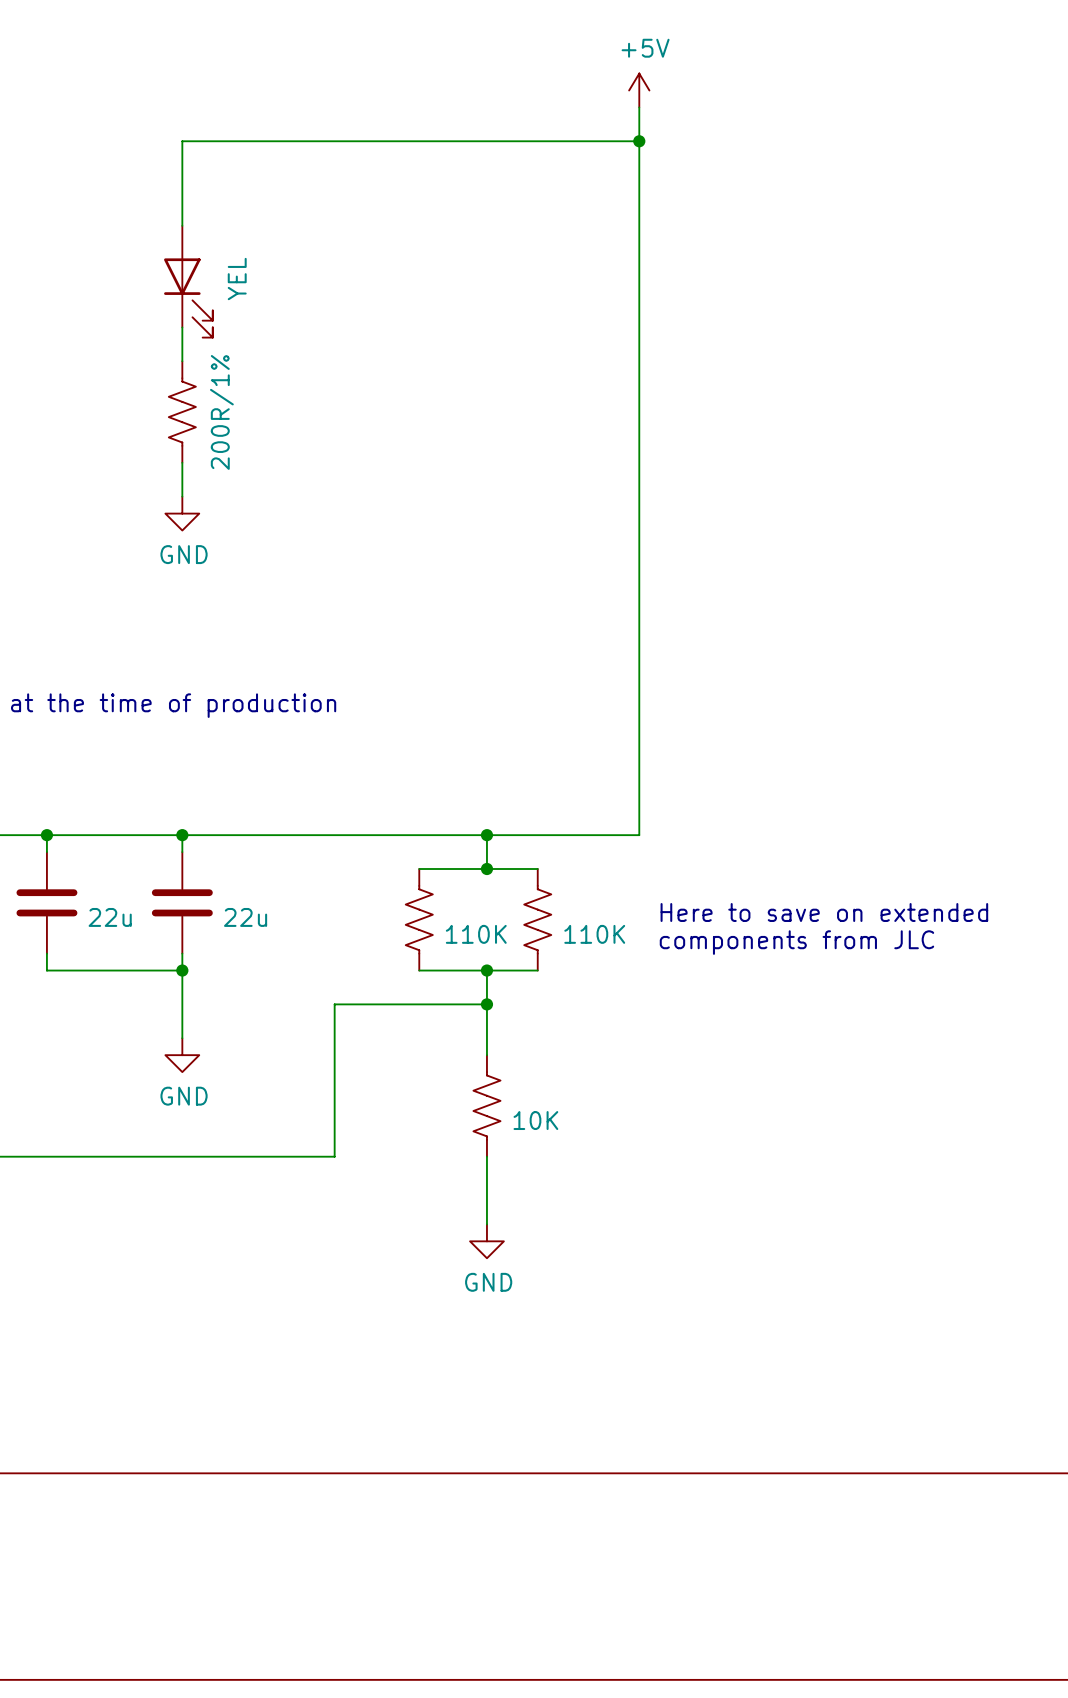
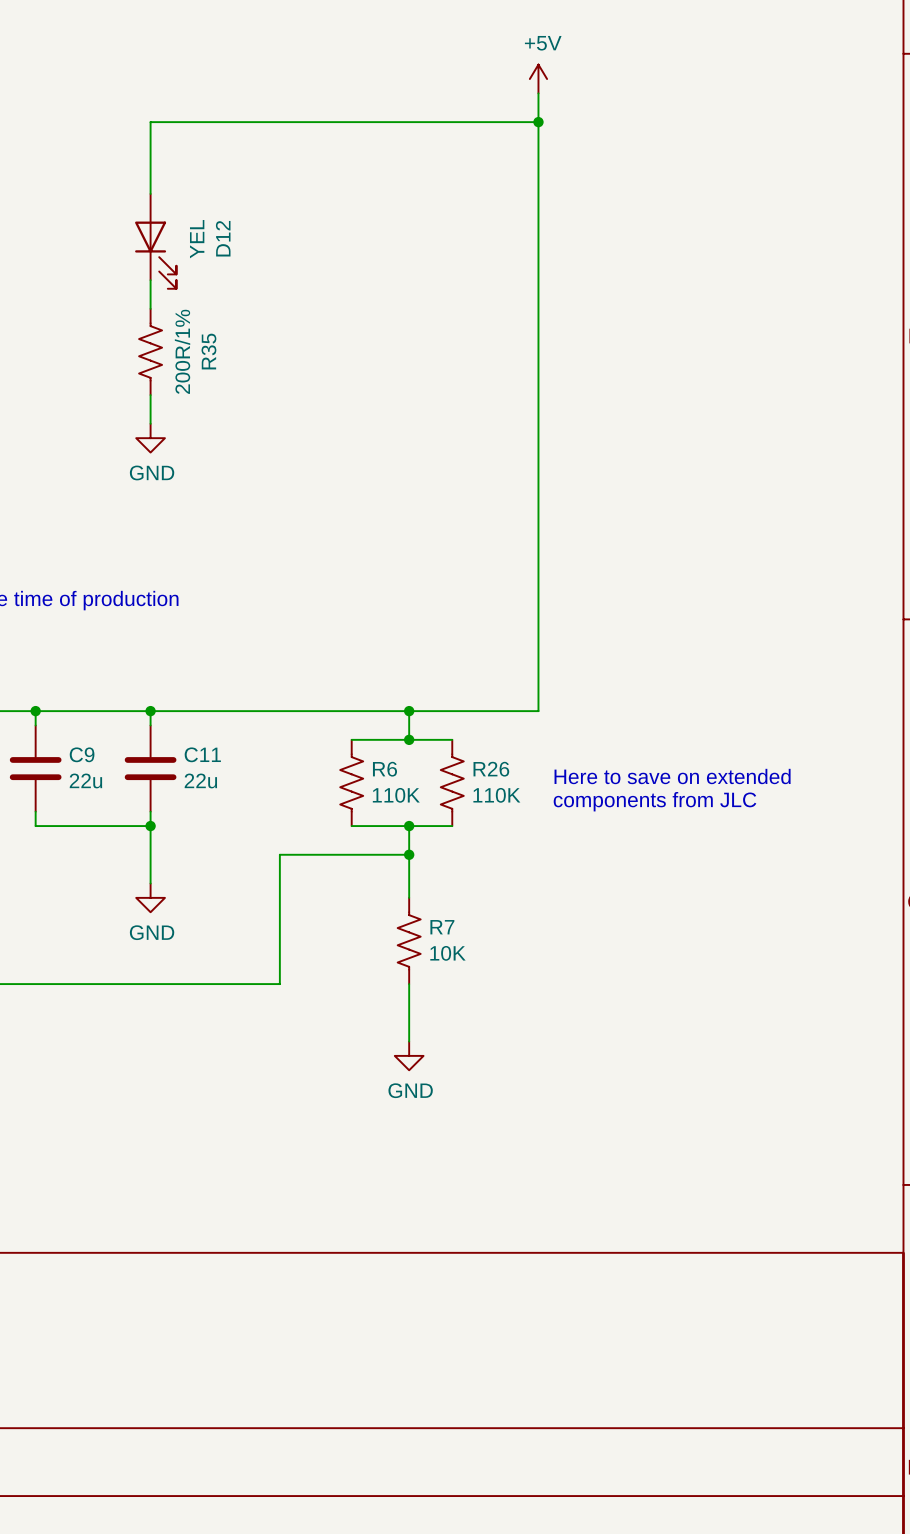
D12 name: none -> D12 (223, 238)
R35 name: none -> R35 (208, 351)
C9 name: none -> C9 (82, 754)
C11 name: none -> C11 (202, 754)
R6 name: none -> R6 (384, 769)
R26 name: none -> R26 (491, 769)
R7 name: none -> R7 (442, 927)

